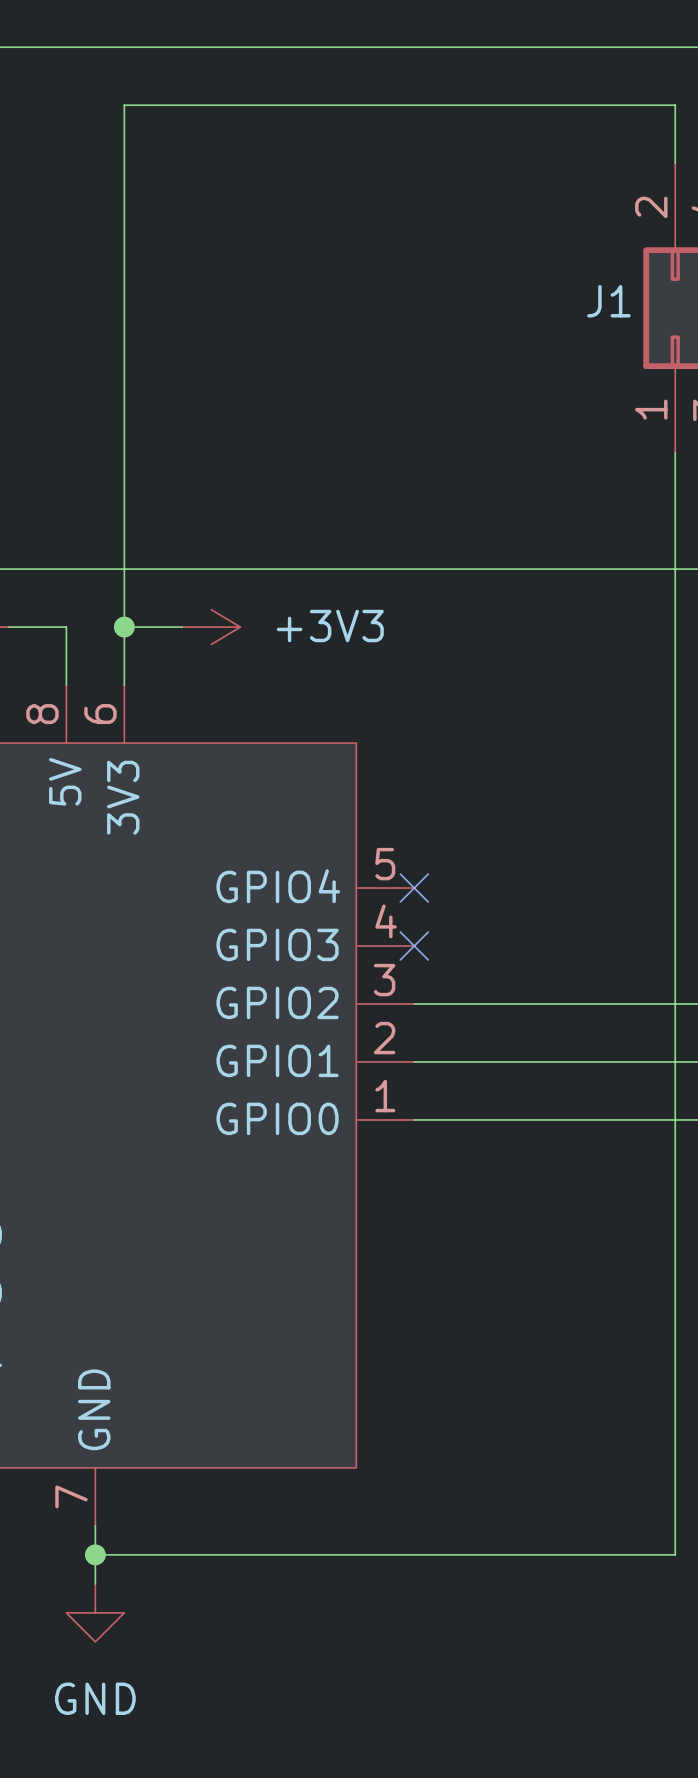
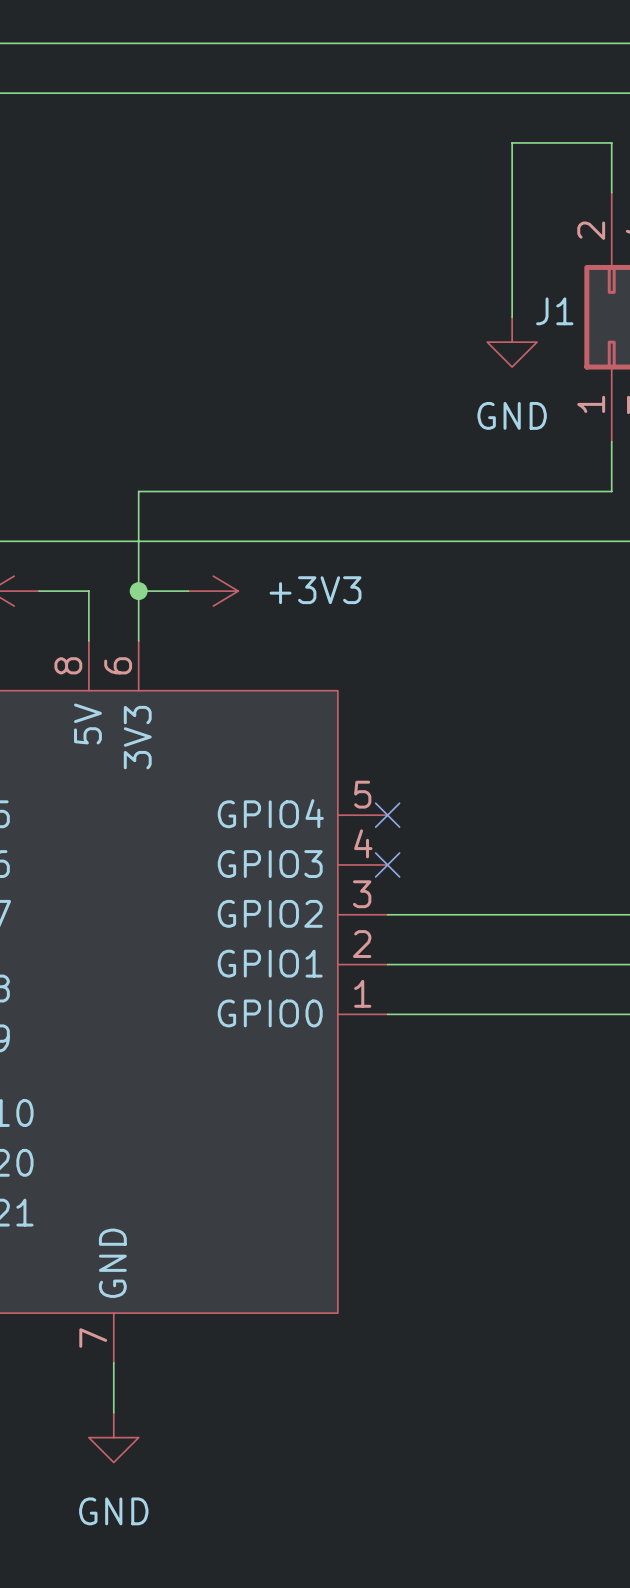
wire: (559, 105) (124, 105) (124, 511) -> (611, 491) (138, 491)
wire: none -> (512, 142) (512, 317)
power symbol: none -> GND (512, 342)
wire: (675, 511) (675, 1554) (95, 1554) -> none
junction: (95, 1554) -> none

